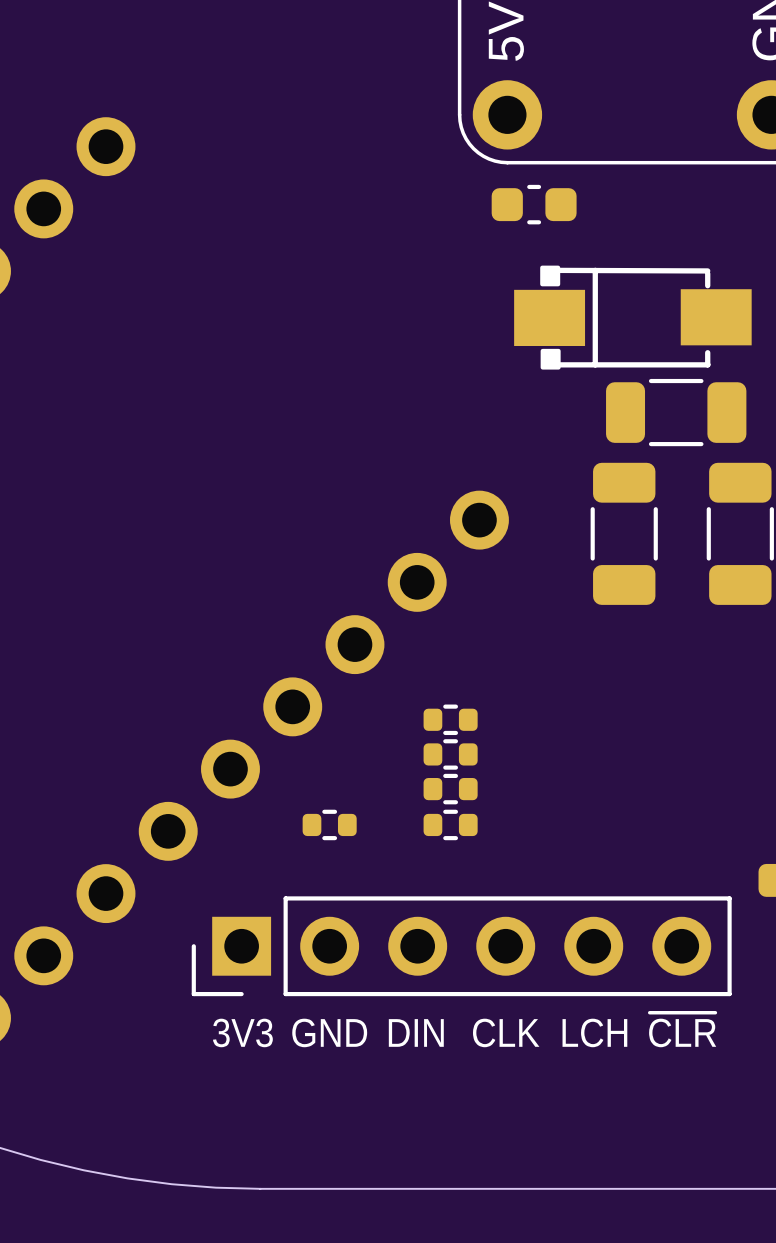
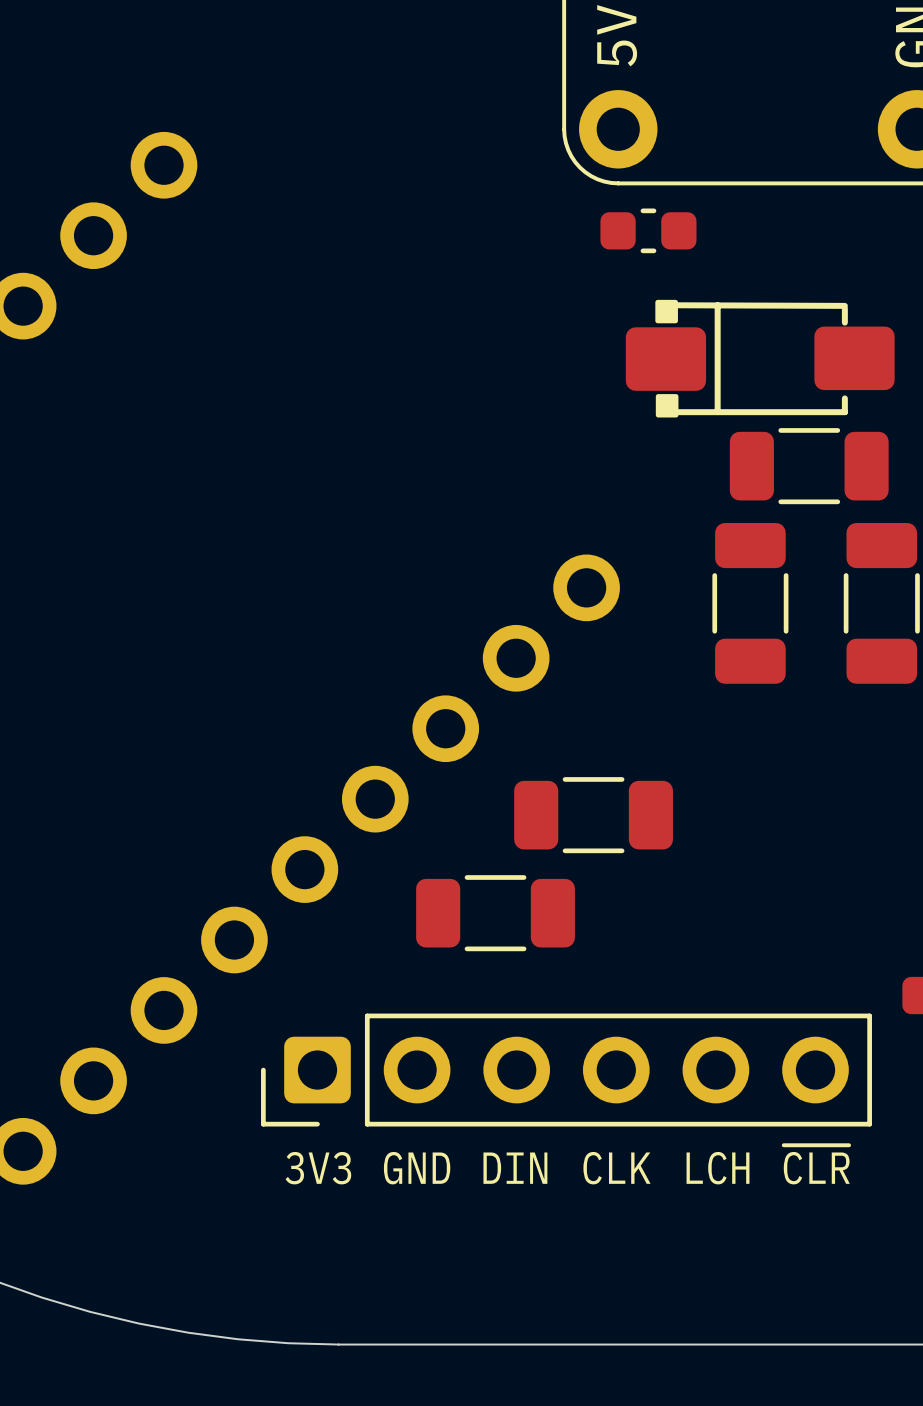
part footprint: [514, 265, 752, 370] -> [625, 299, 895, 418]
part: (450, 719) -> none
part: none -> (593, 815)
part: (450, 754) -> none
part: (450, 789) -> none
part: none -> (495, 913)
part: (329, 824) -> none
part: (450, 824) -> none
part footprint: [191, 896, 732, 997] -> [261, 1013, 872, 1127]

